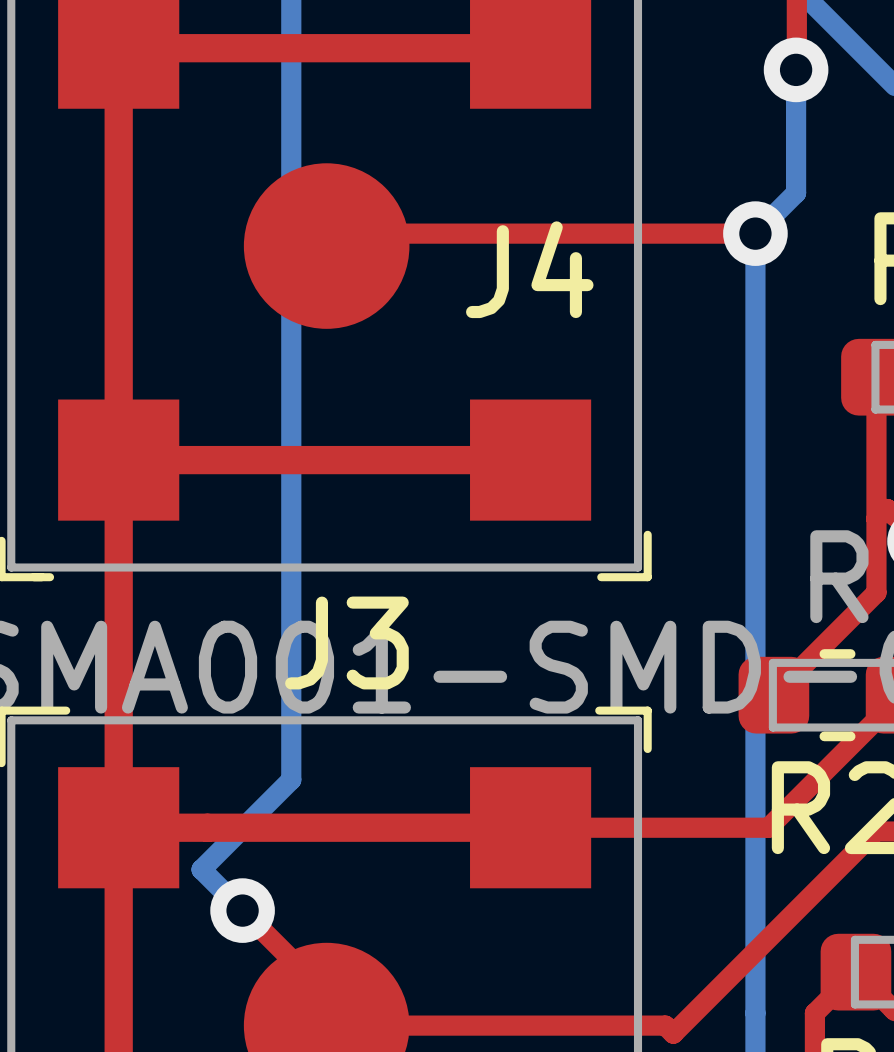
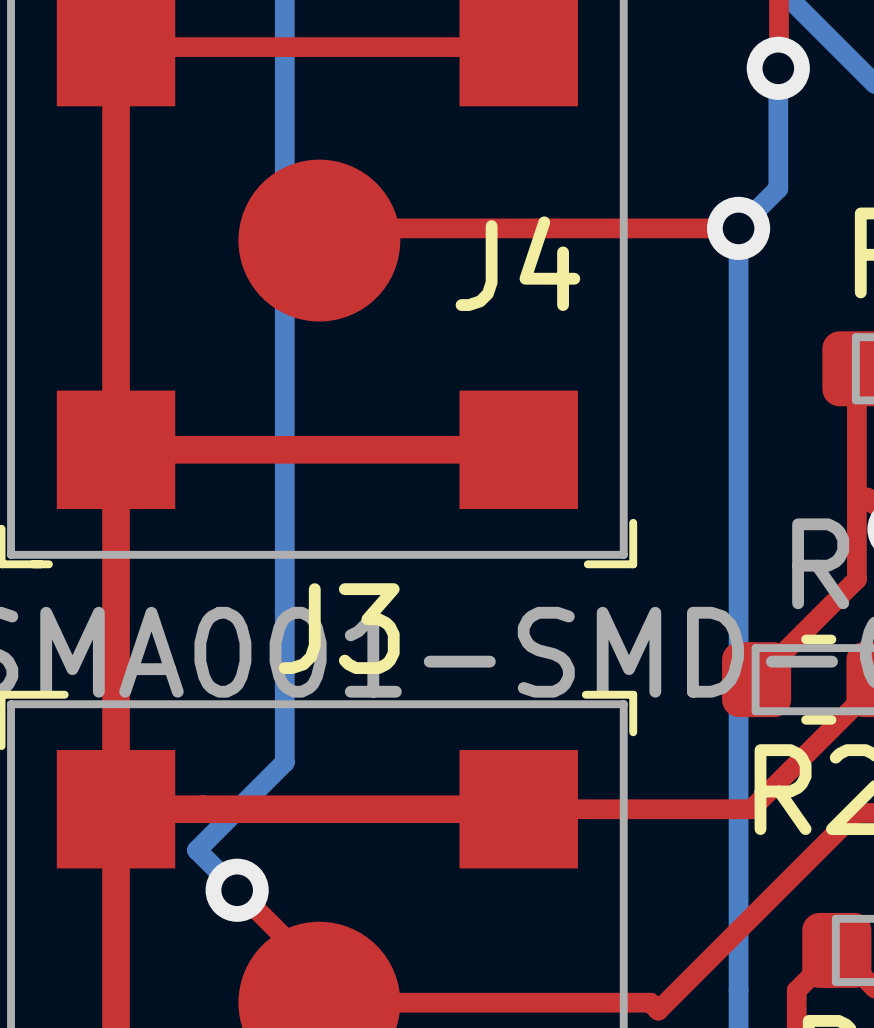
top track width: thick (118, 48) (530, 48) -> thin (116, 47) (518, 47)

